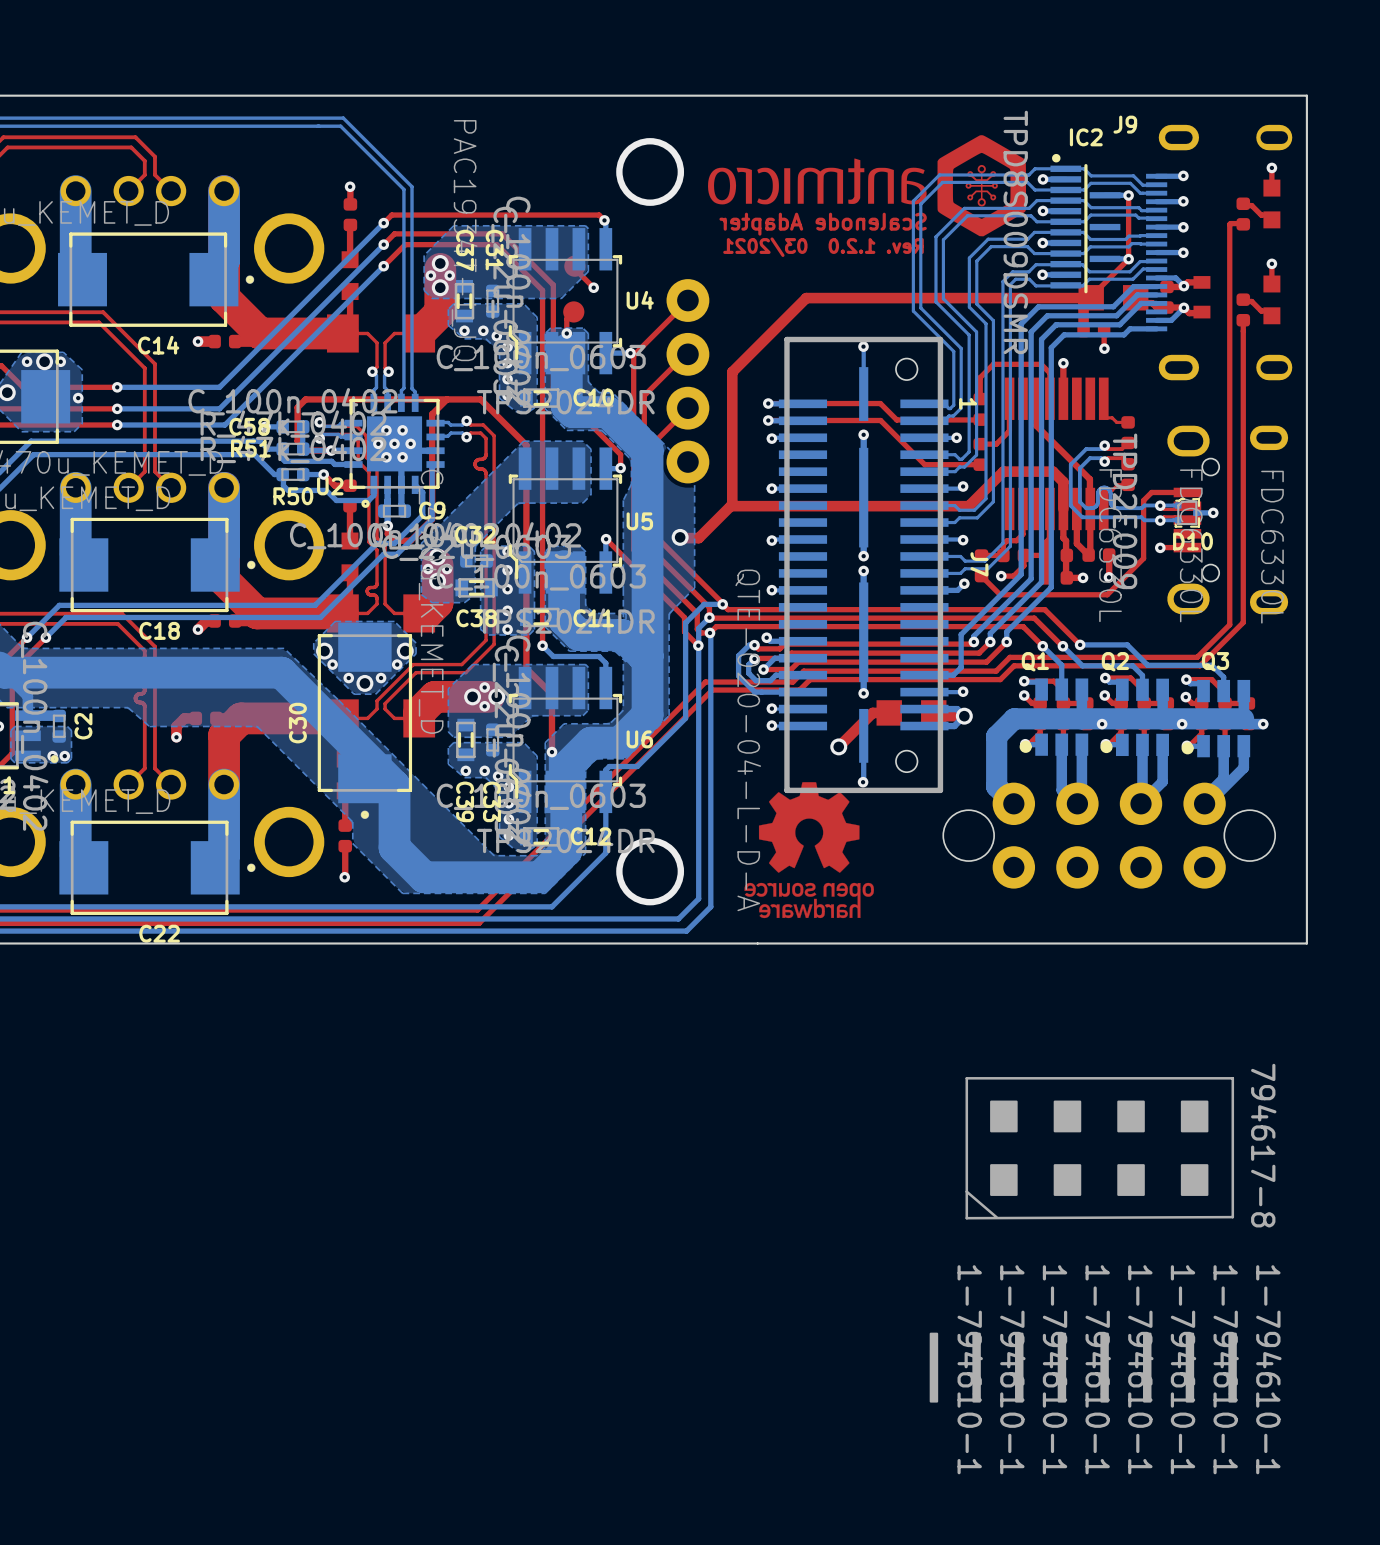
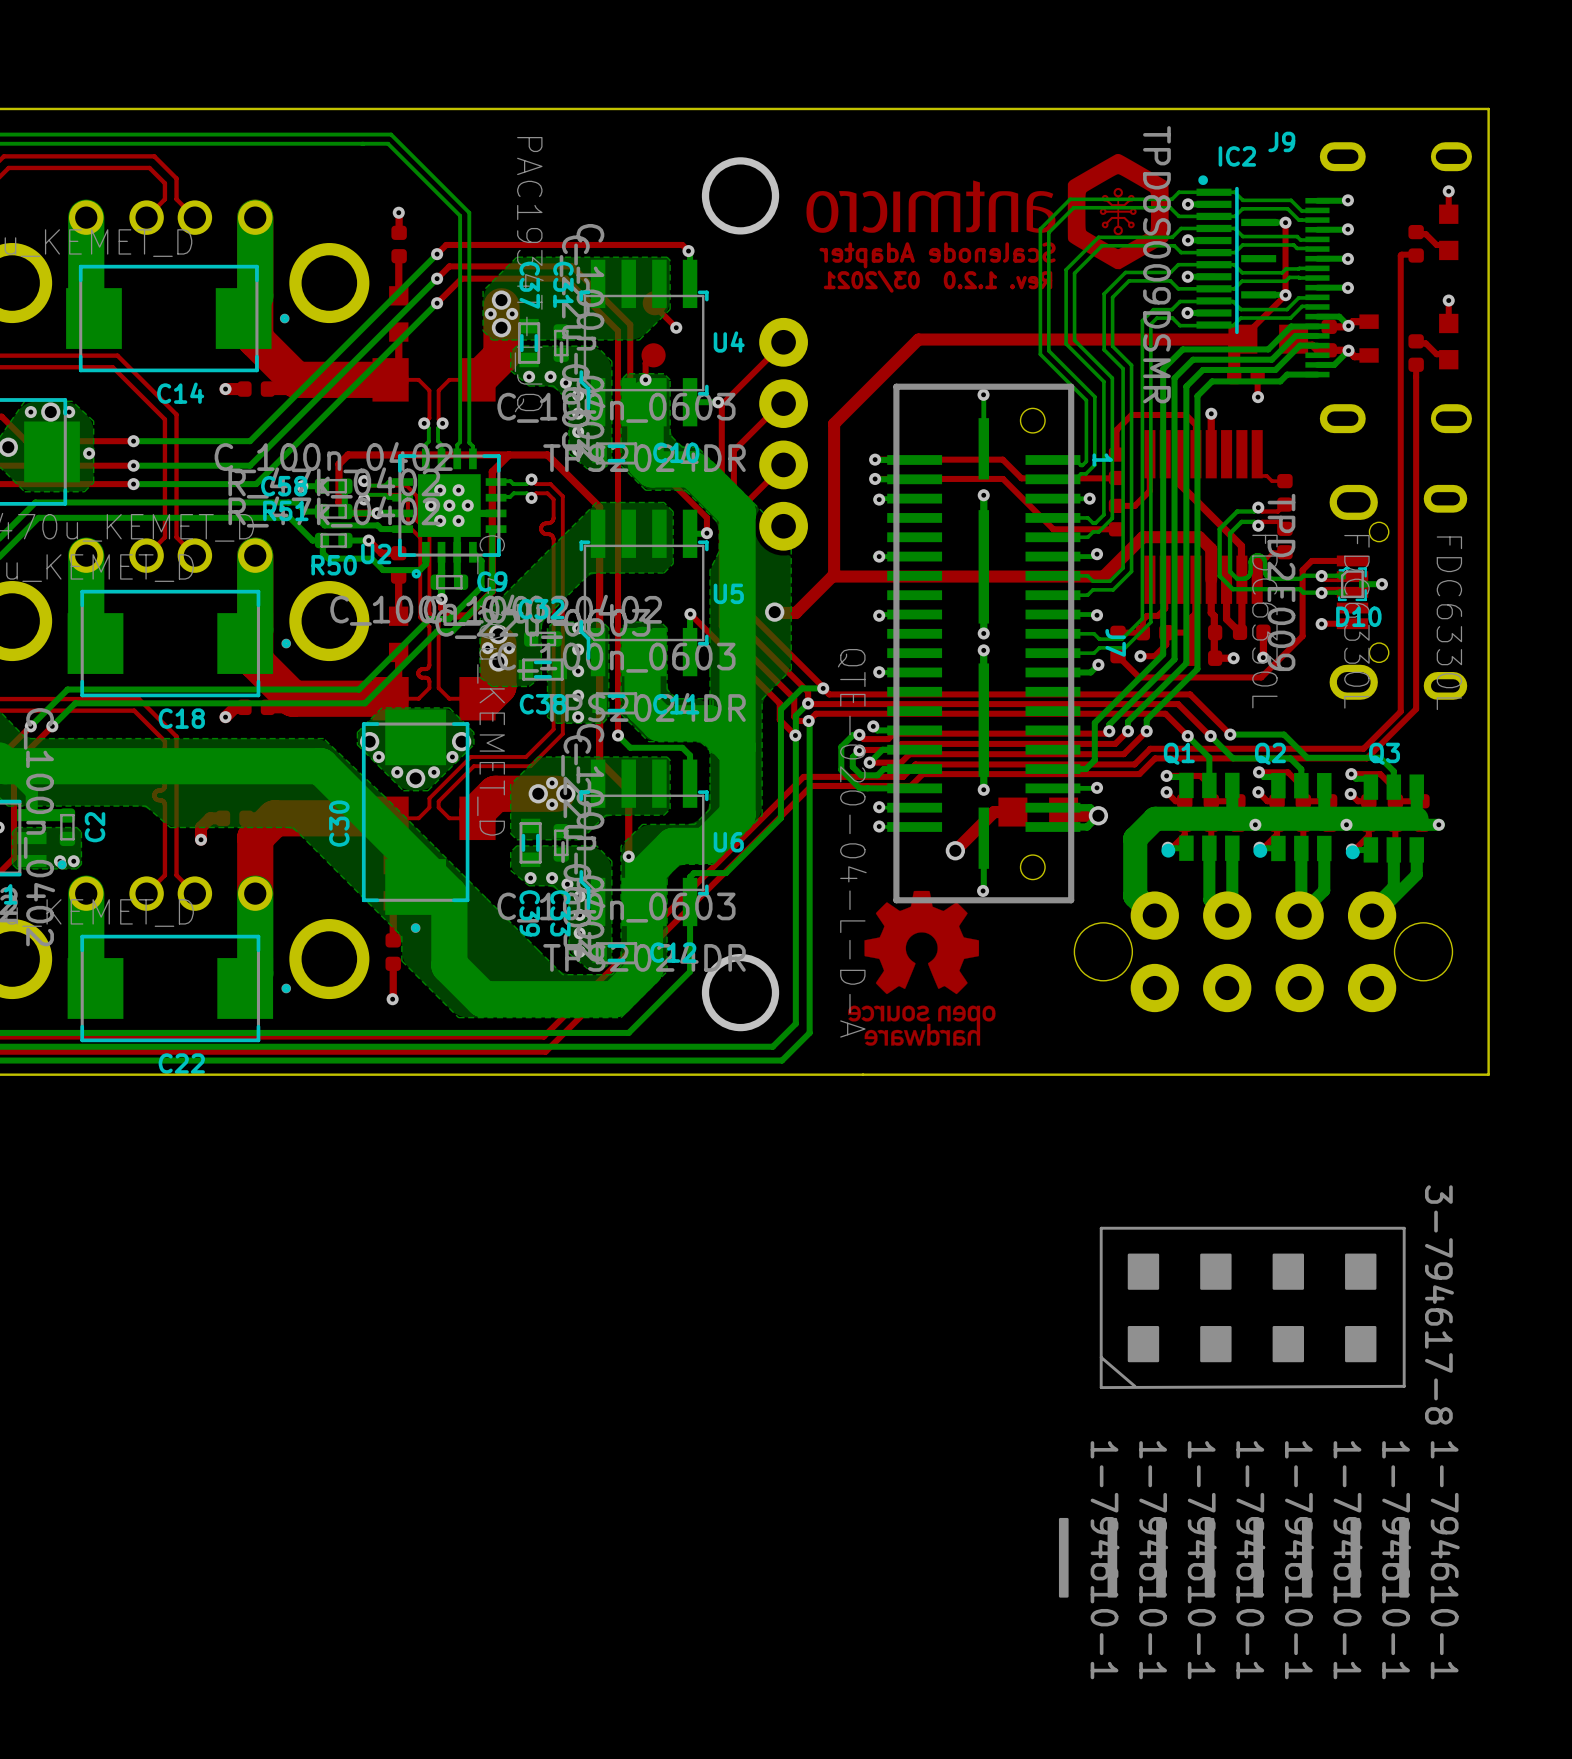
drawing shape: [965, 1063, 1277, 1228] -> [1099, 1185, 1454, 1425]

